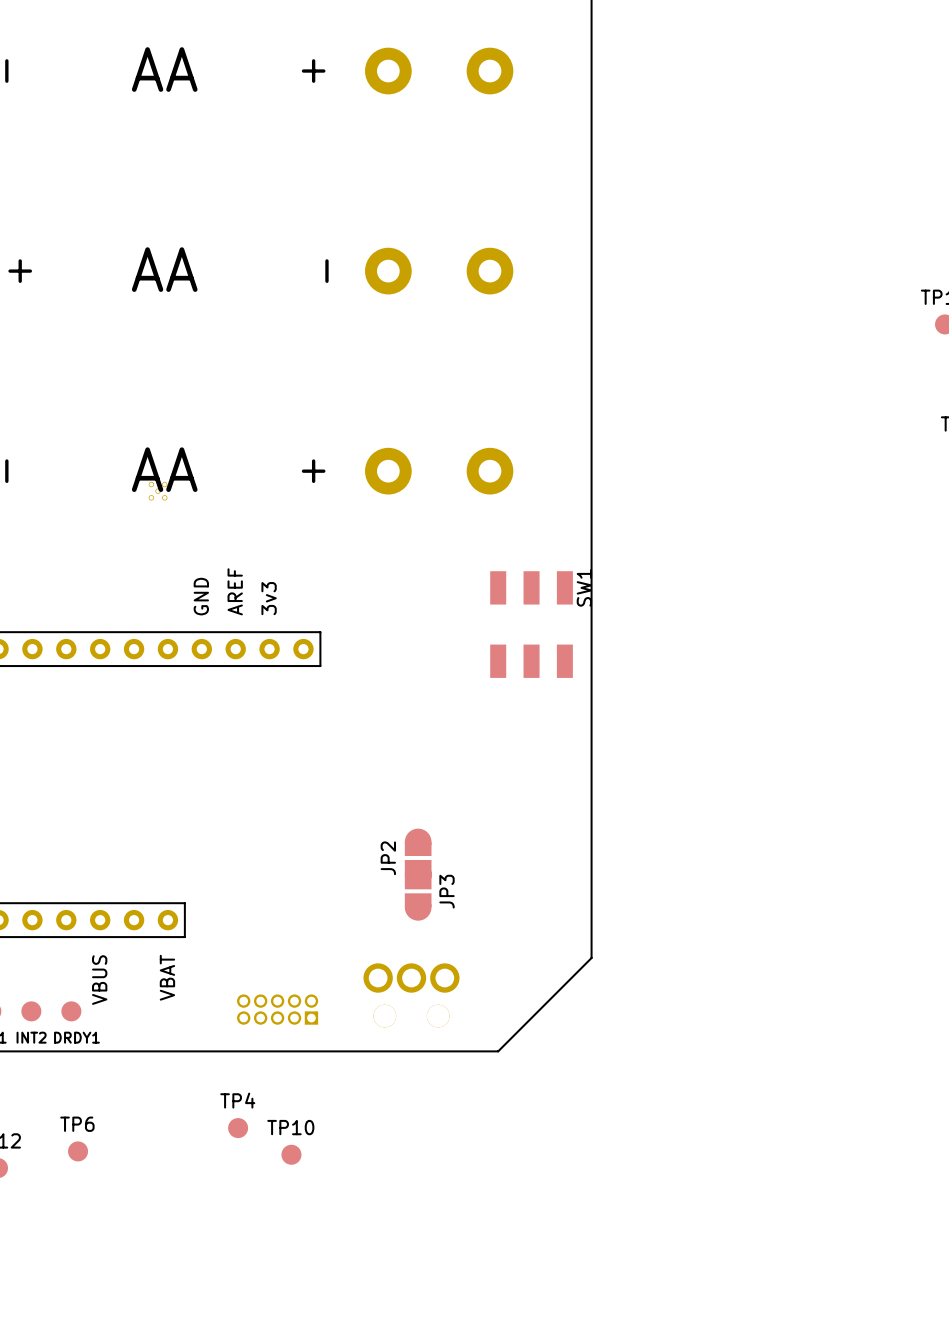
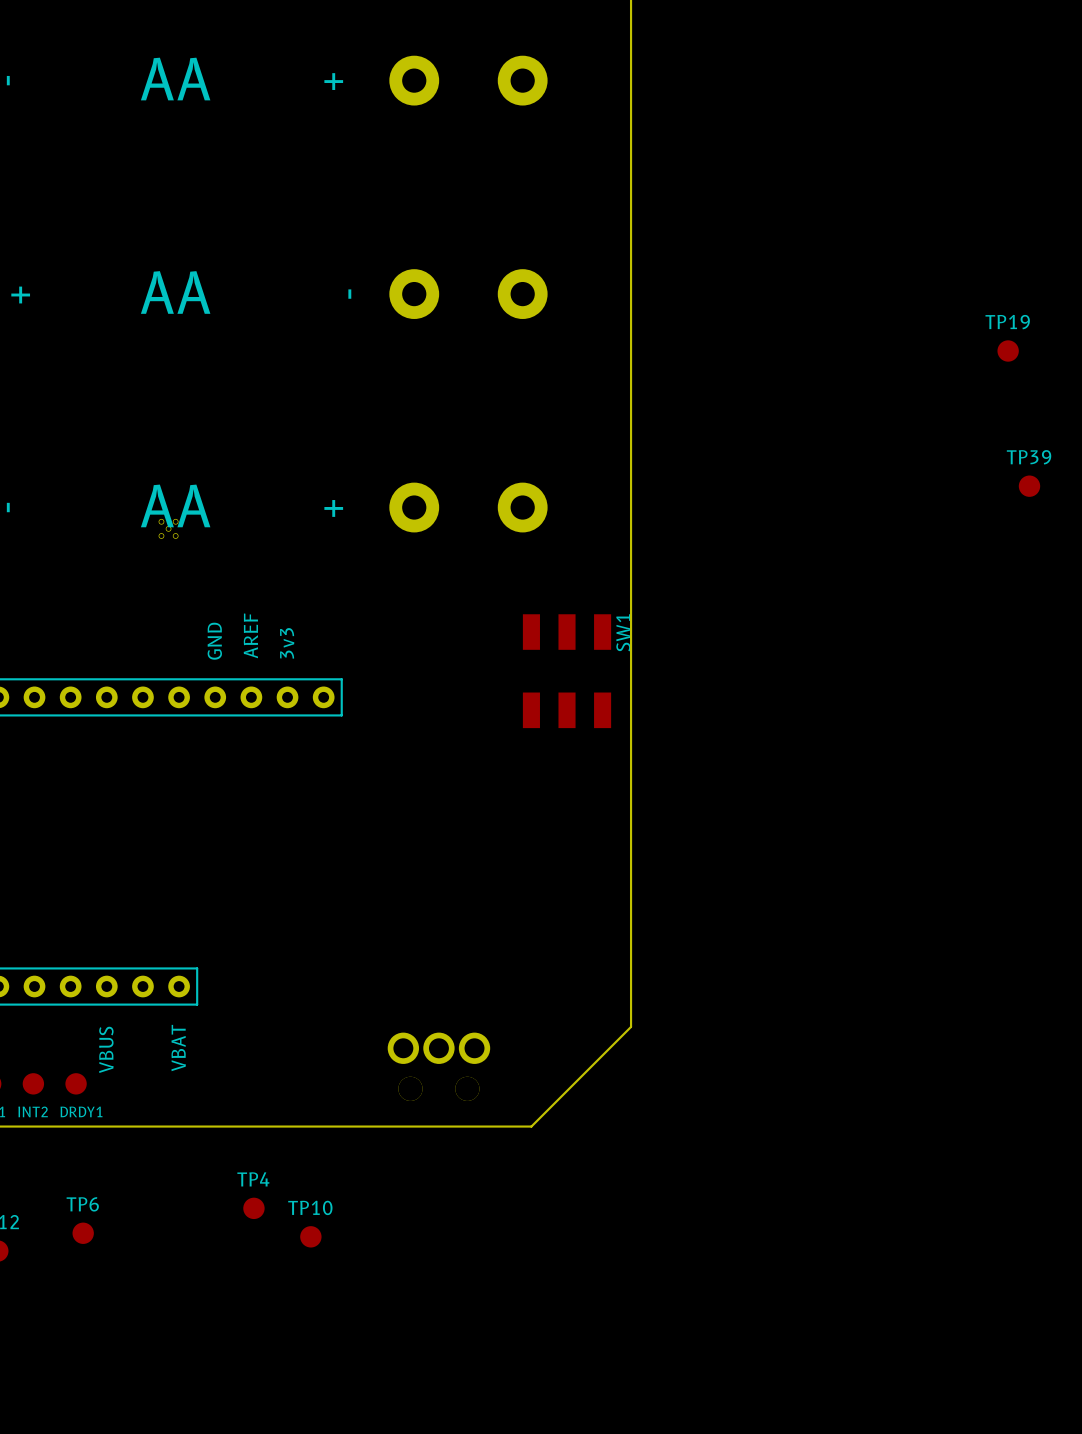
JP2: (418, 857) -> none
JP3: (418, 891) -> none
part: (277, 1009) -> none

